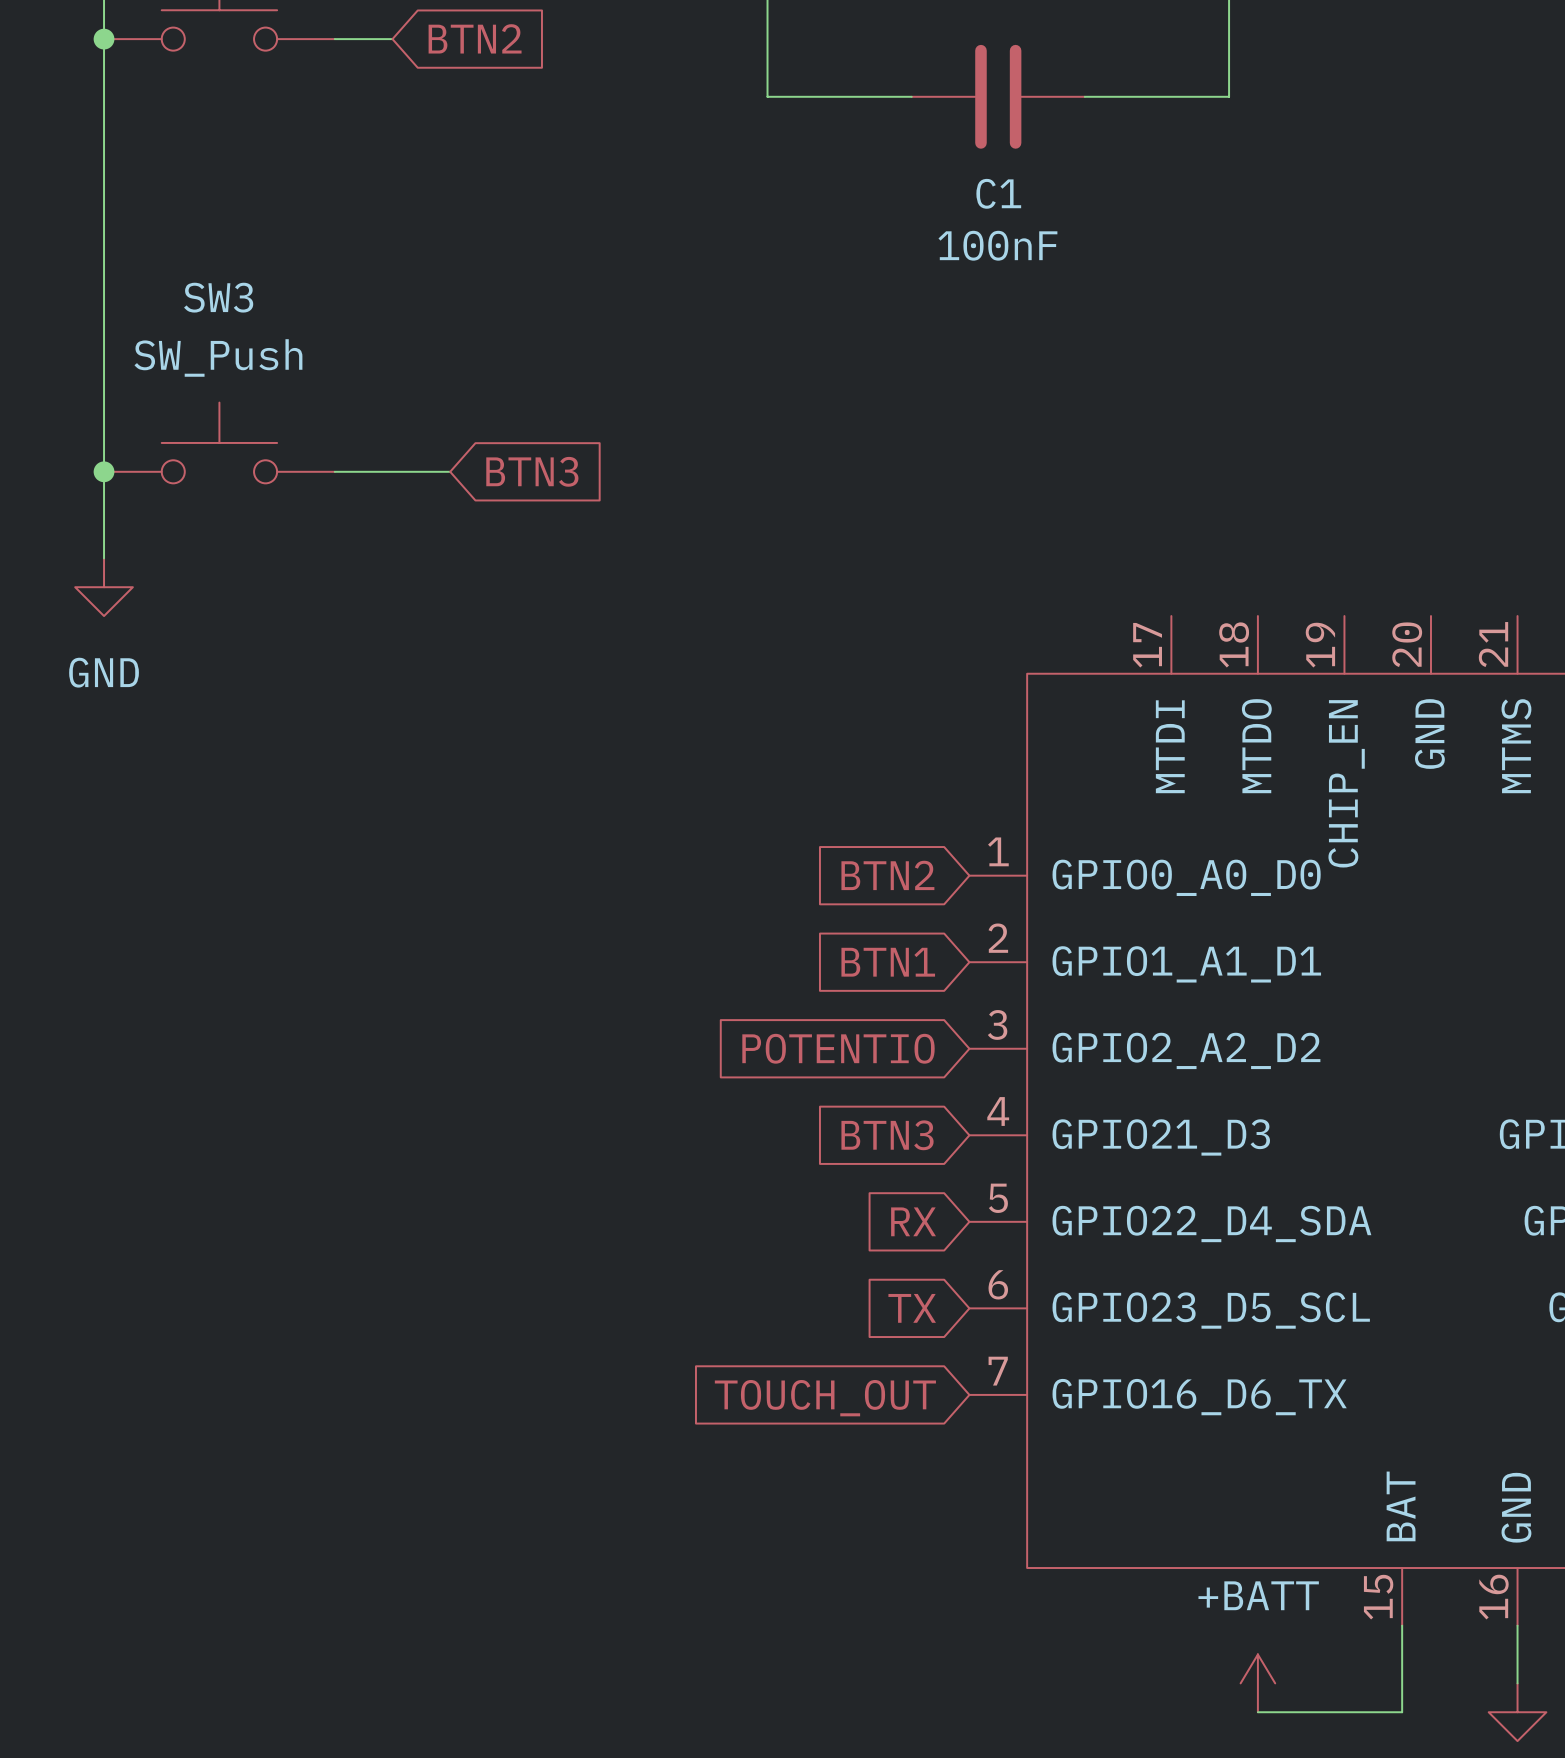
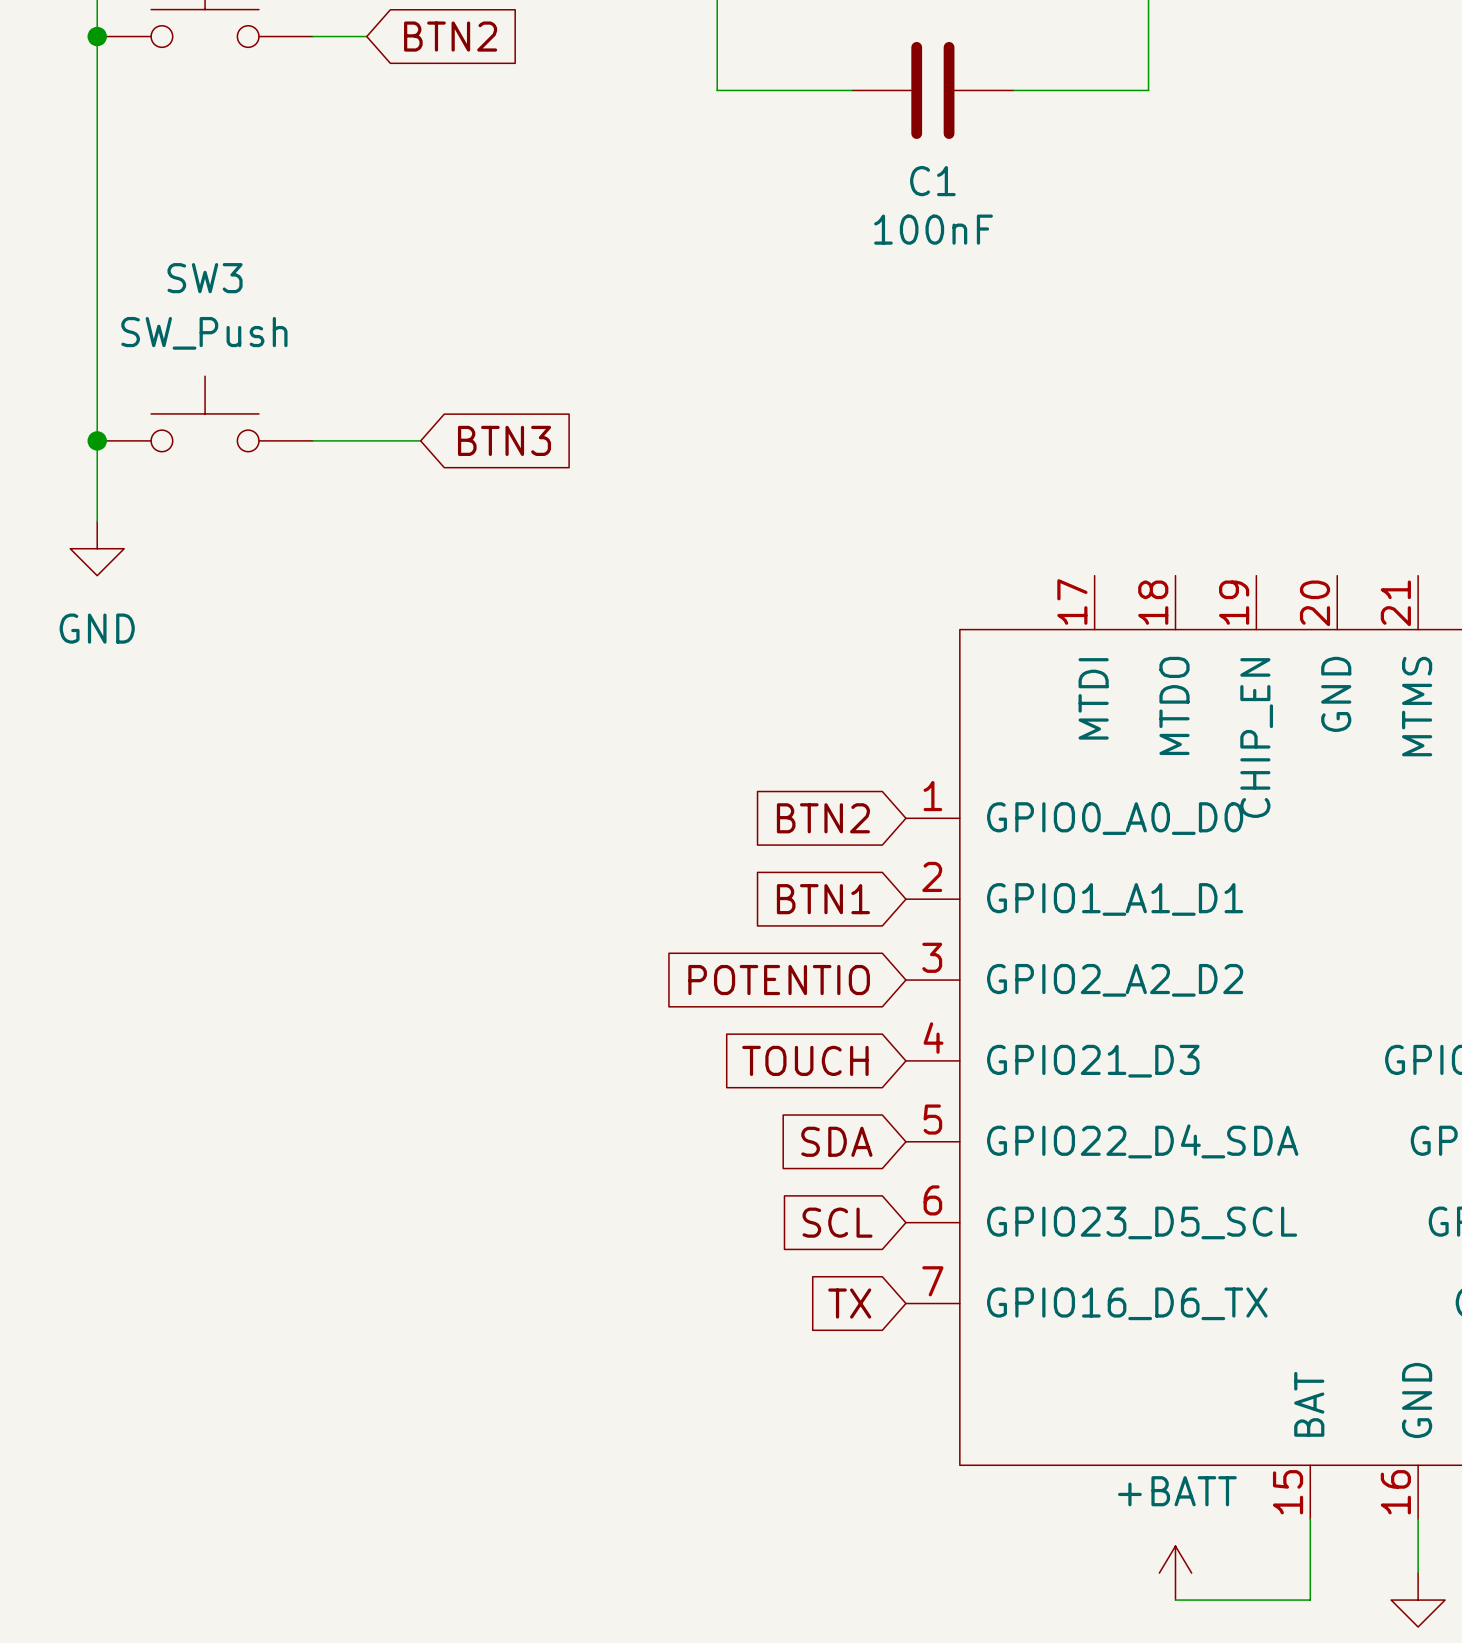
global label: BTN3 (887, 1135) -> TOUCH (805, 1060)
global label: RX (913, 1221) -> SDA (836, 1141)
global label: TX (912, 1308) -> SCL (837, 1222)
global label: TOUCH_OUT (825, 1398) -> TX (849, 1303)

